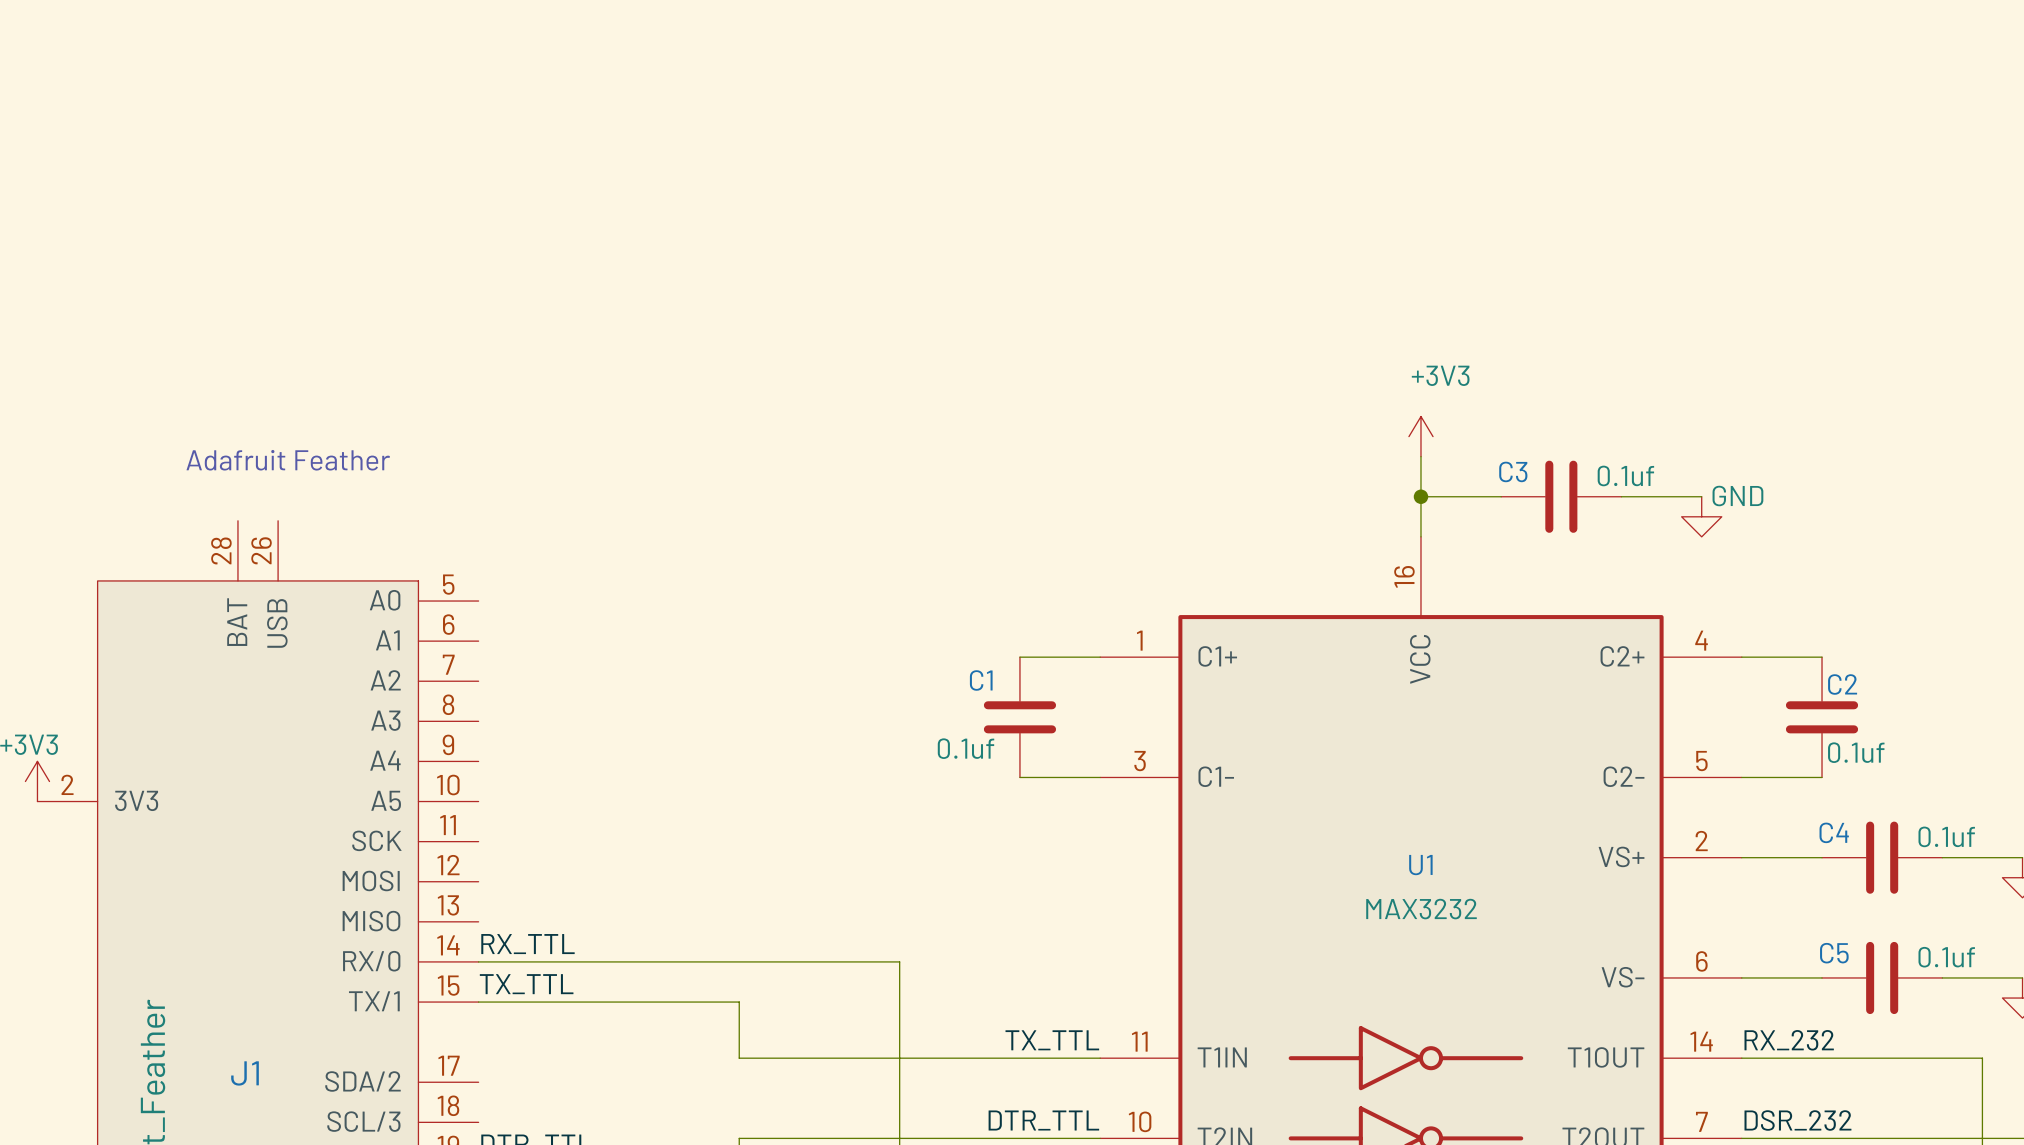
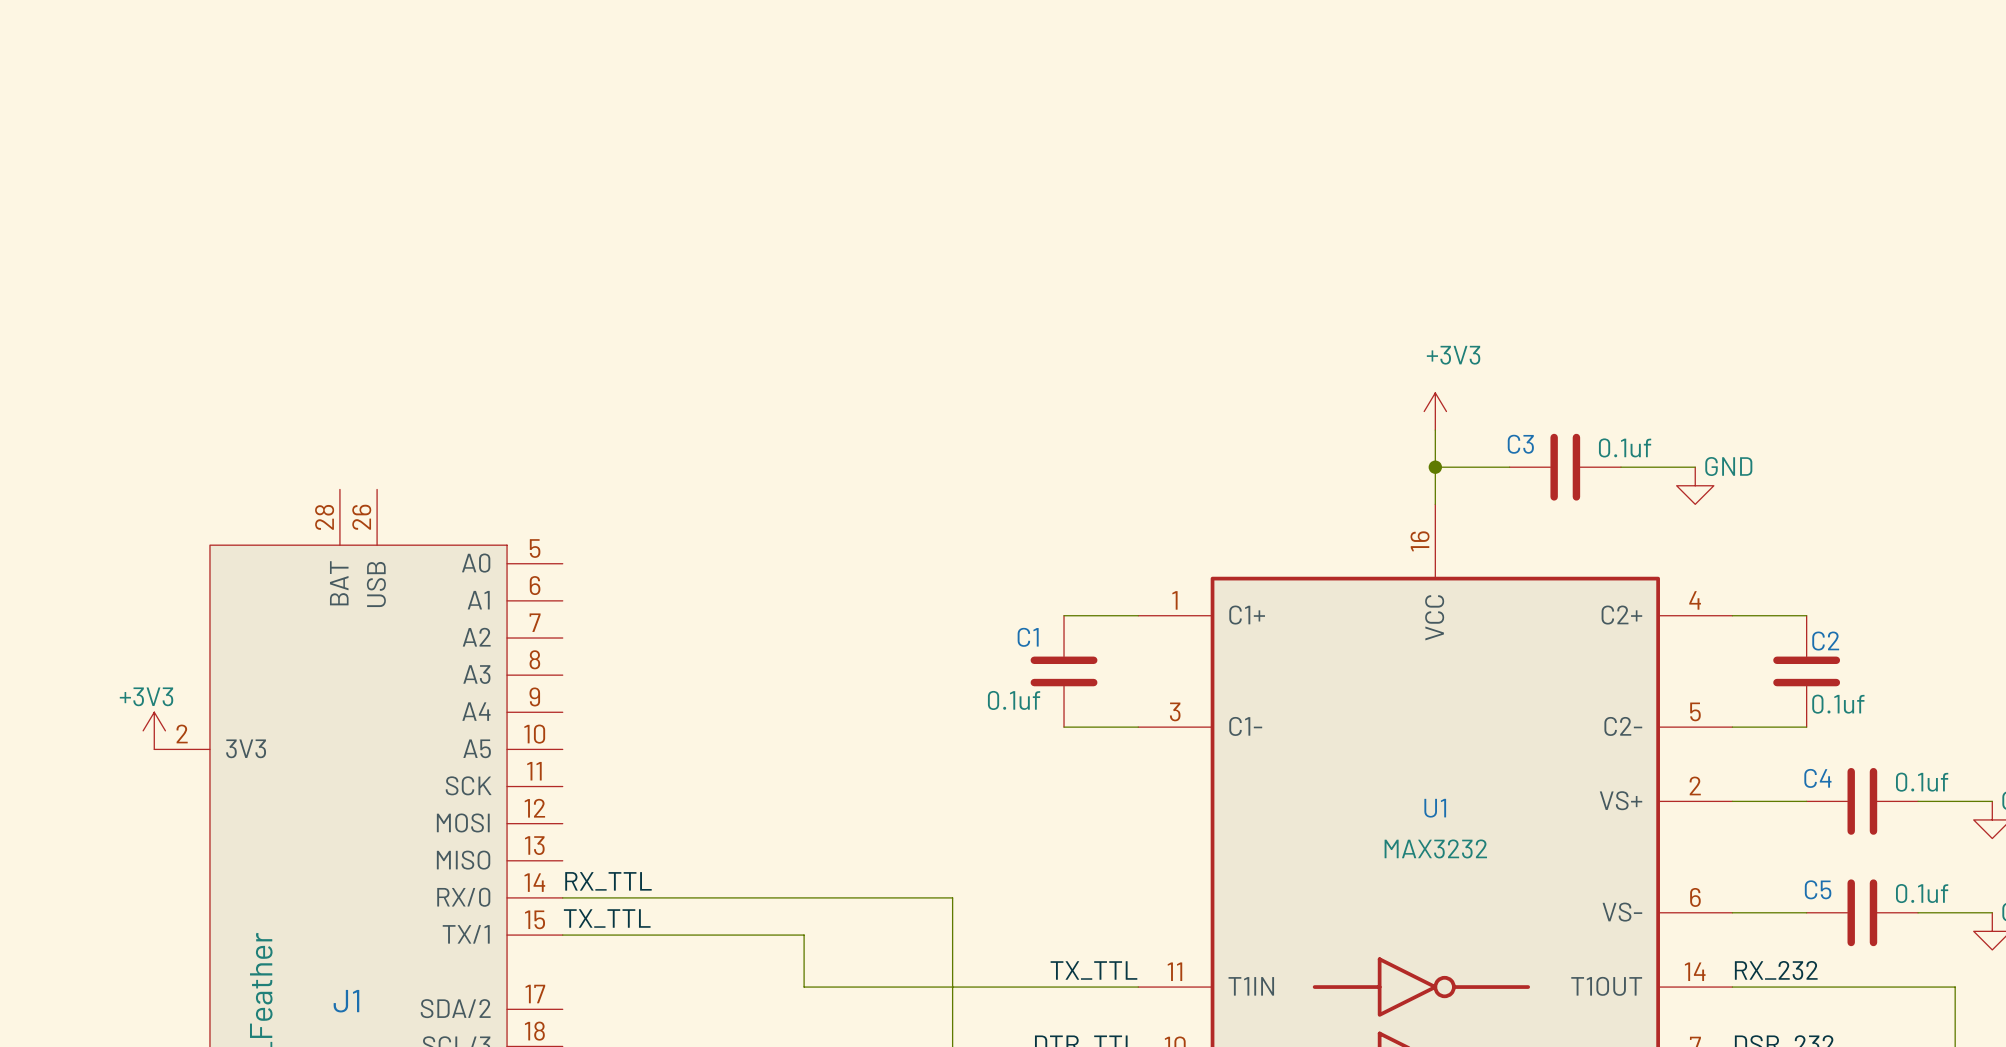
text: Adafruit Feather (288, 460) -> none

